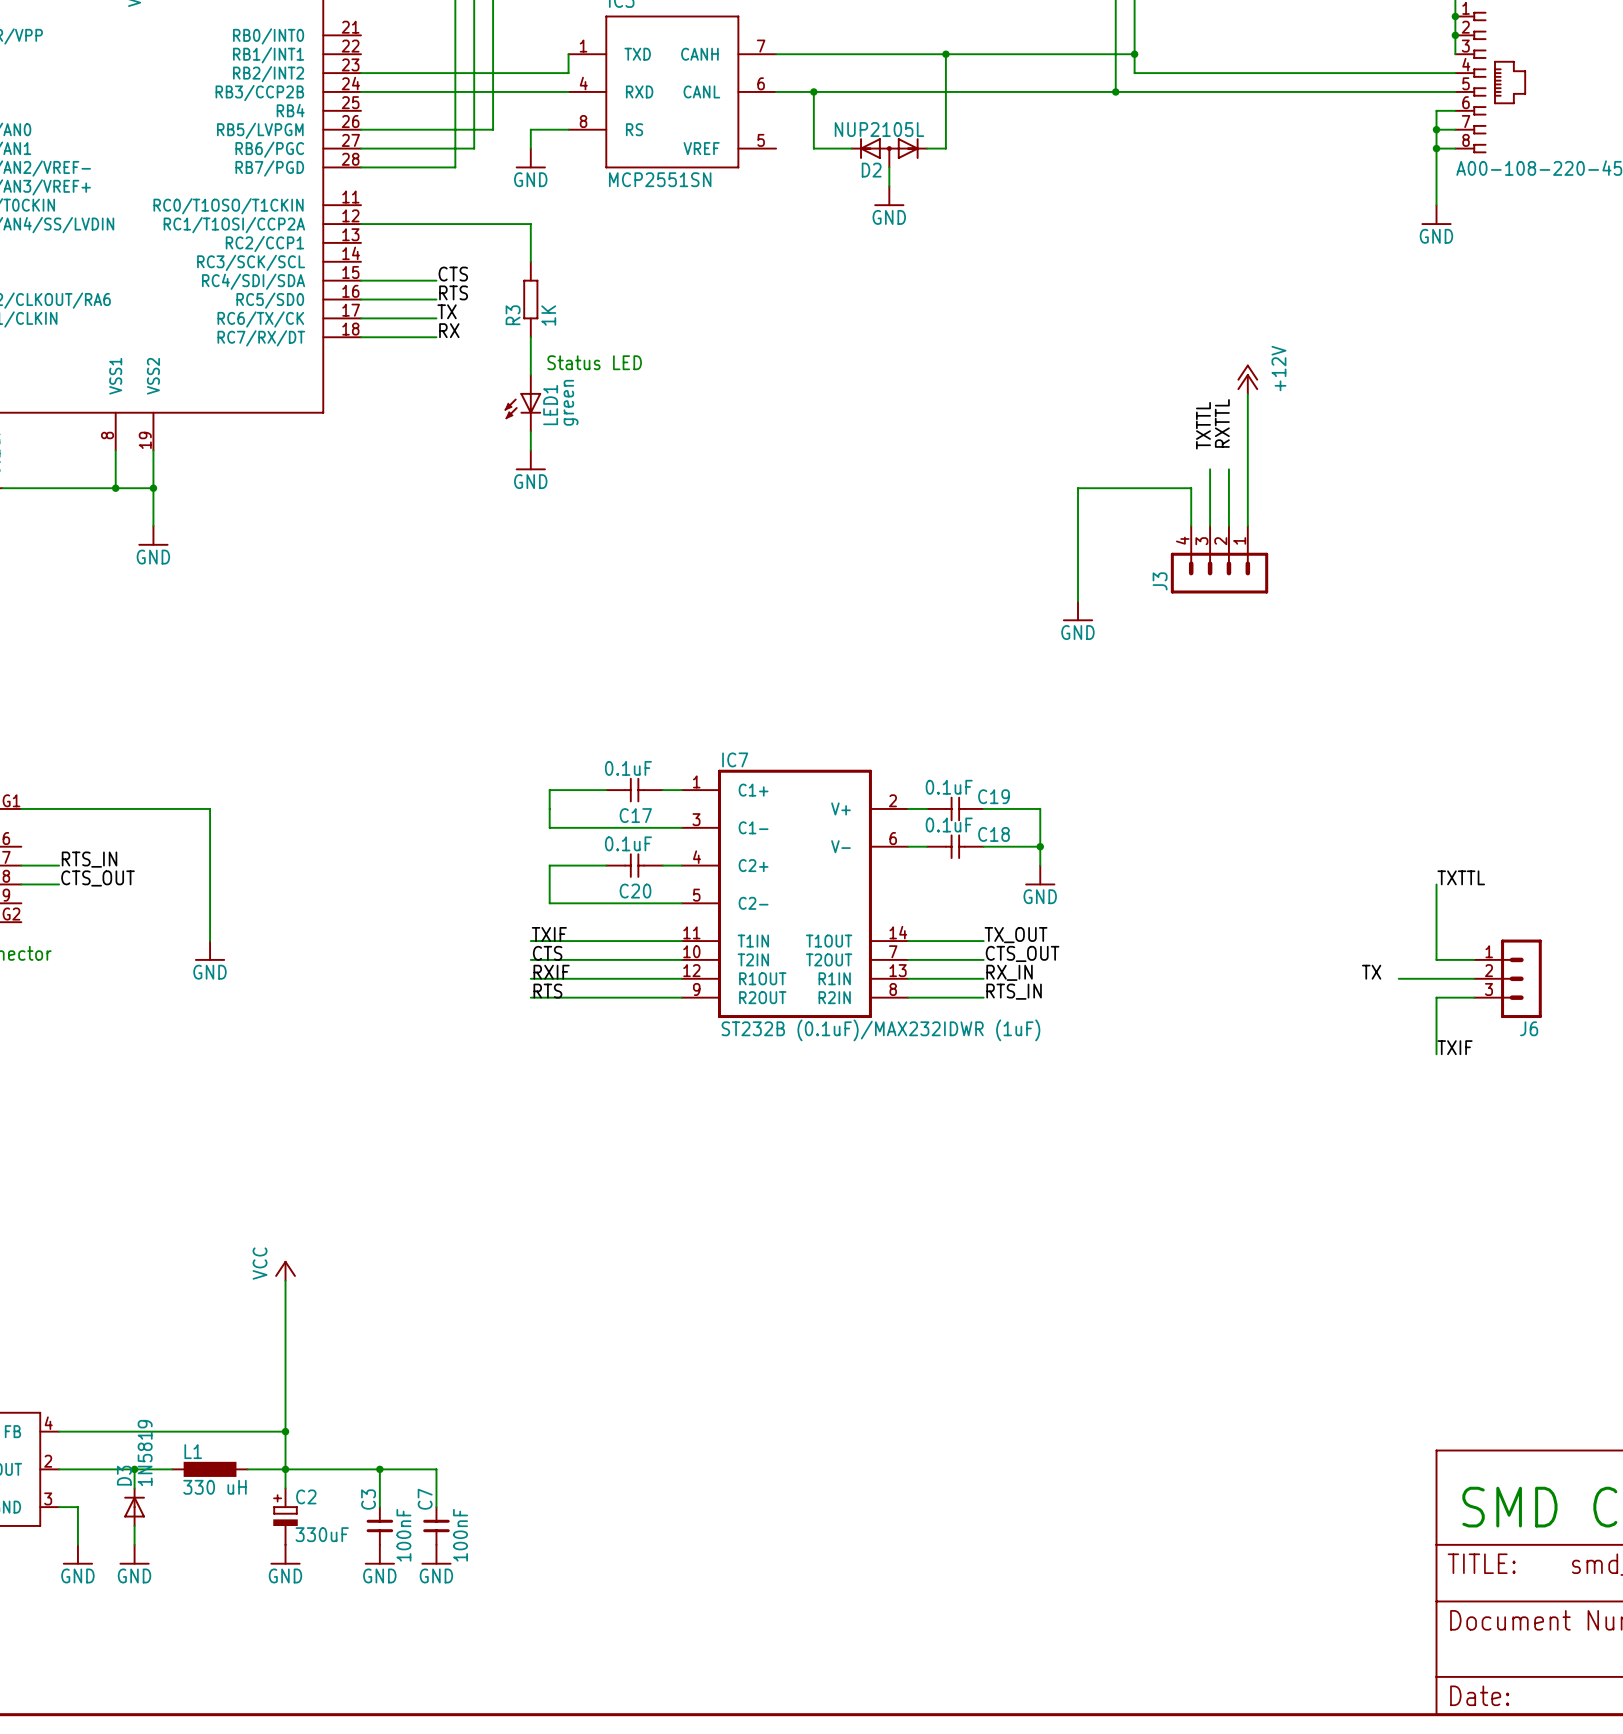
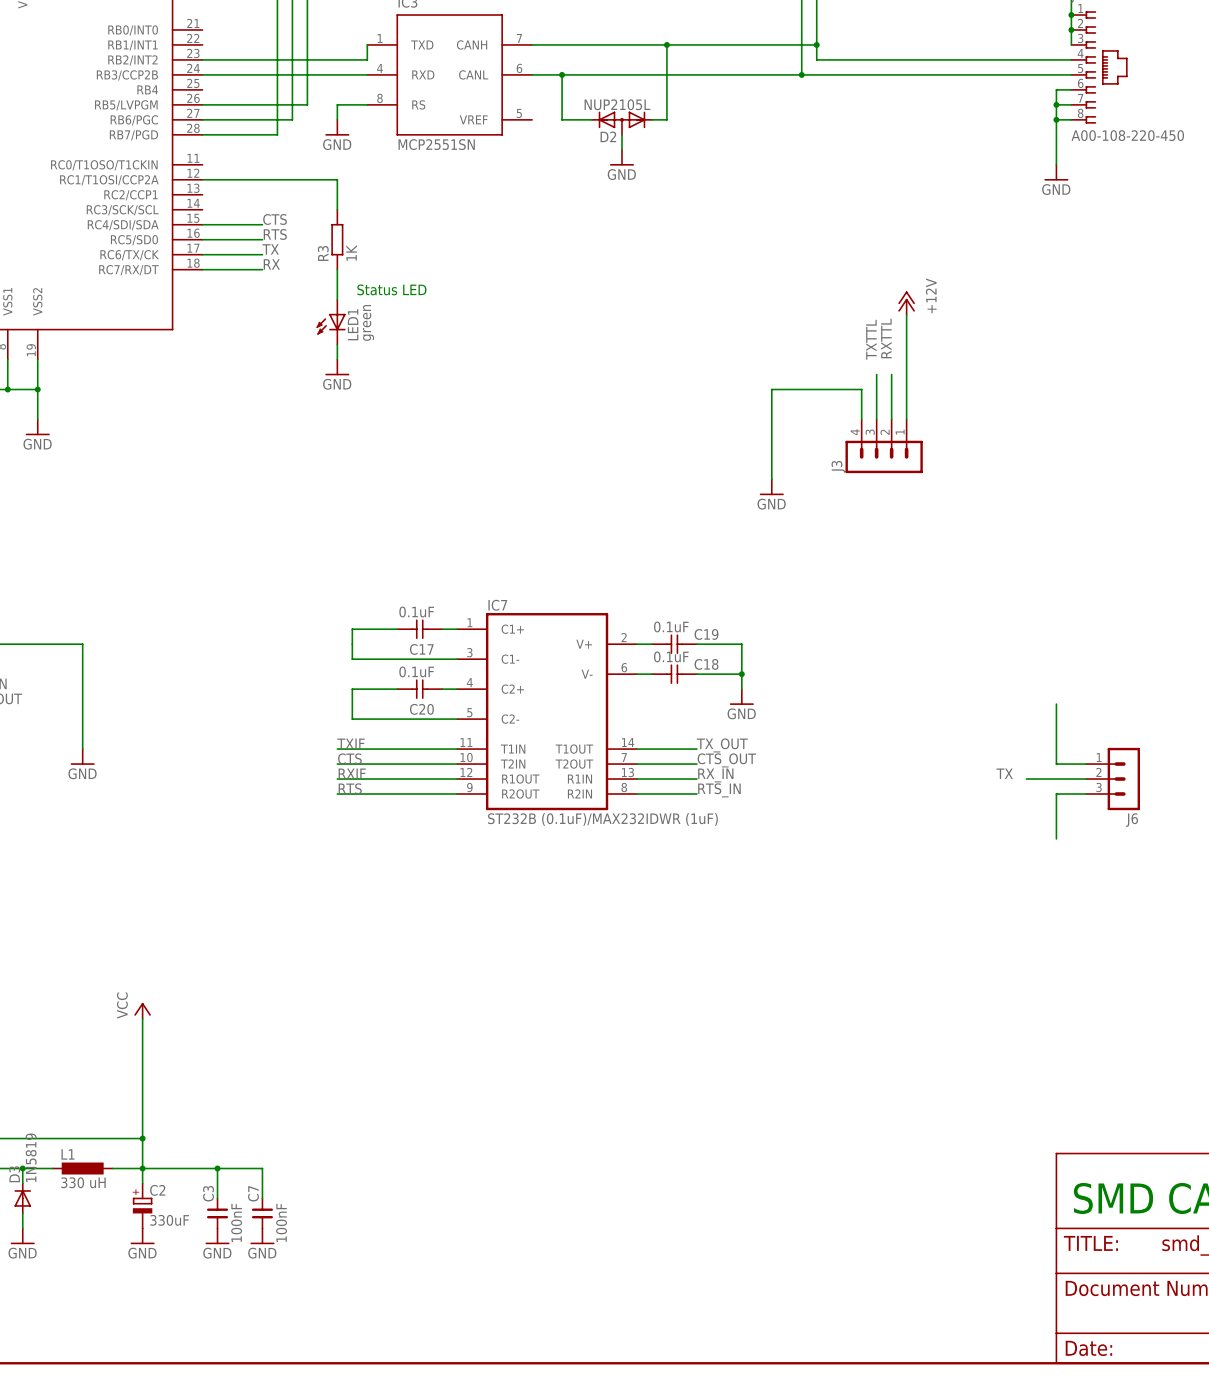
label: TXTTL (1461, 877) -> none
label: TXIF (1455, 1047) -> none

